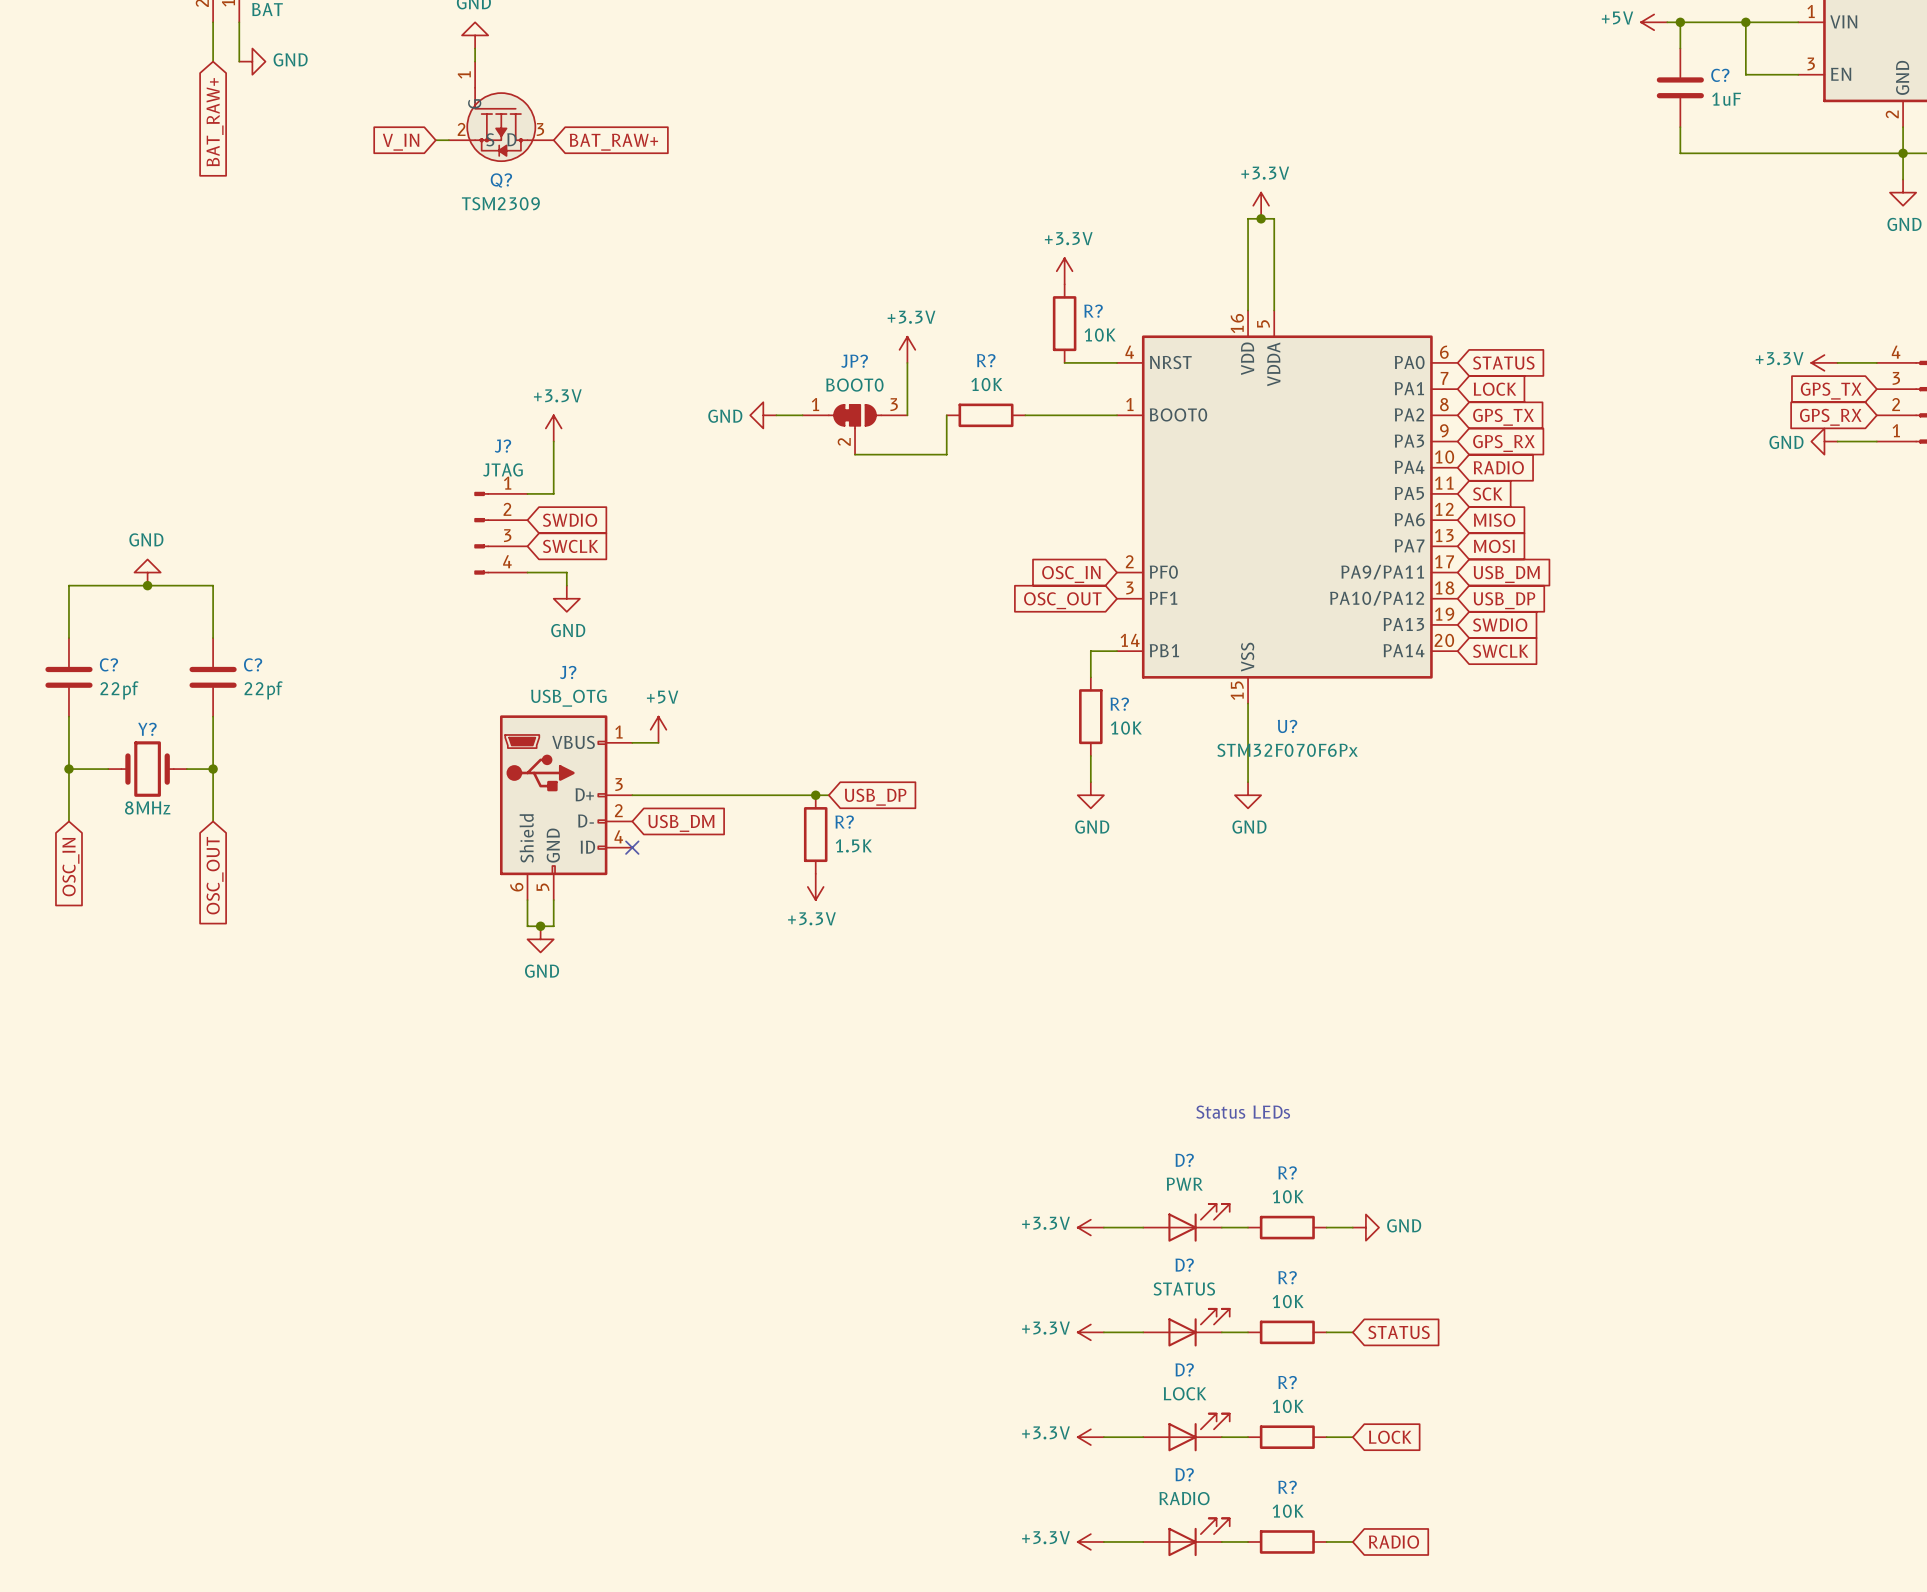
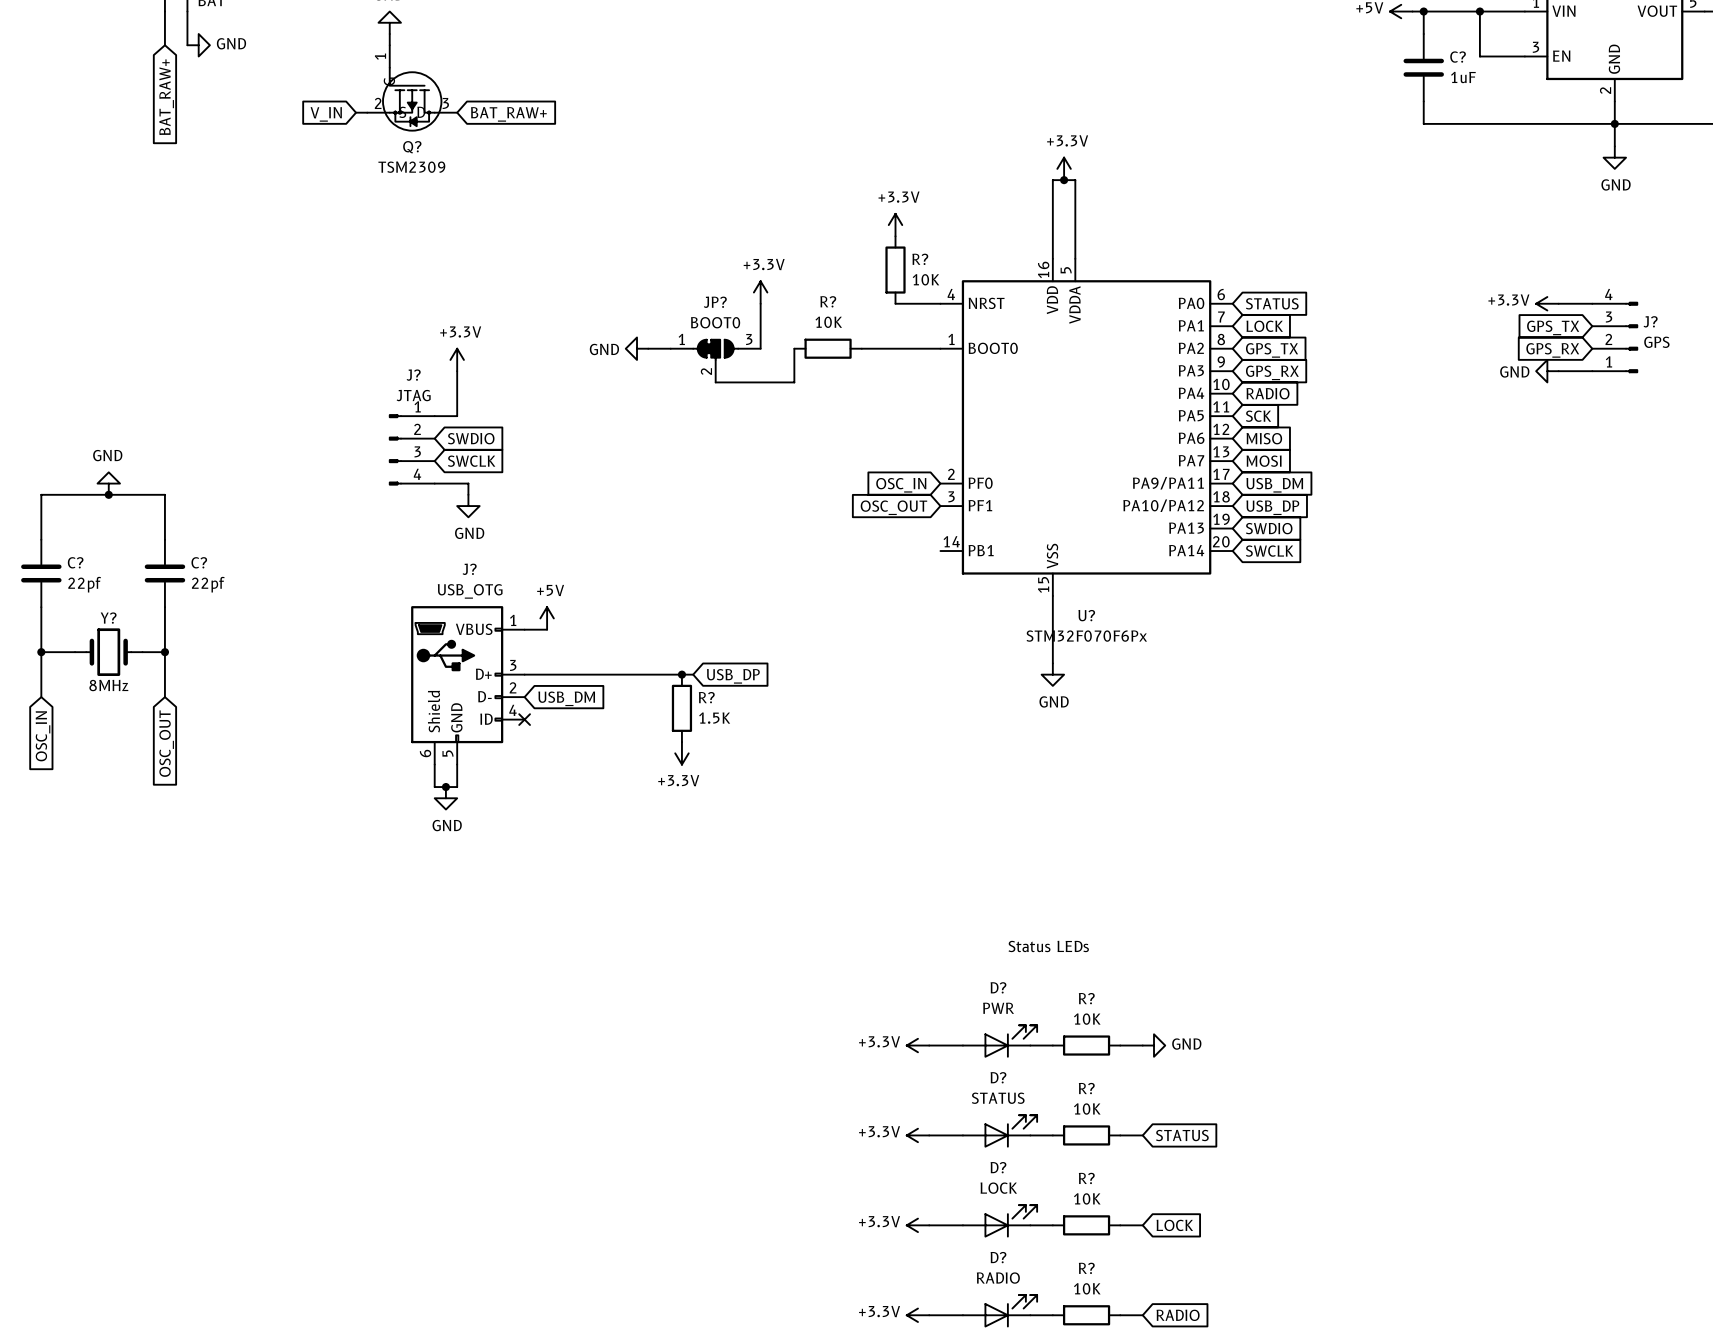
wire: (1117, 651) (1090, 651) (1090, 677) -> none
R?: 10K (1090, 716) -> none
wire: (1090, 755) (1090, 782) -> none
power symbol: GND (1090, 795) -> none

